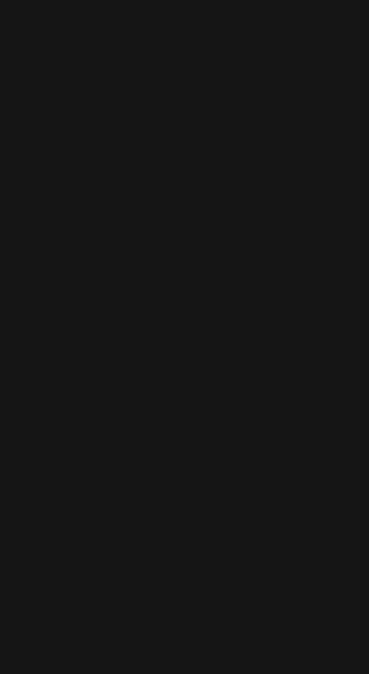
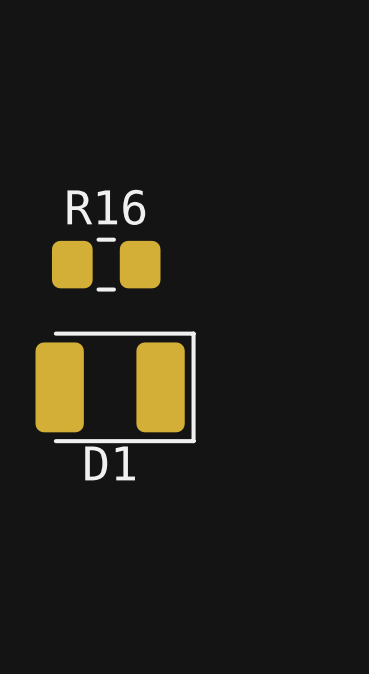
R16: none -> (106, 264)
D1: none -> (115, 387)

